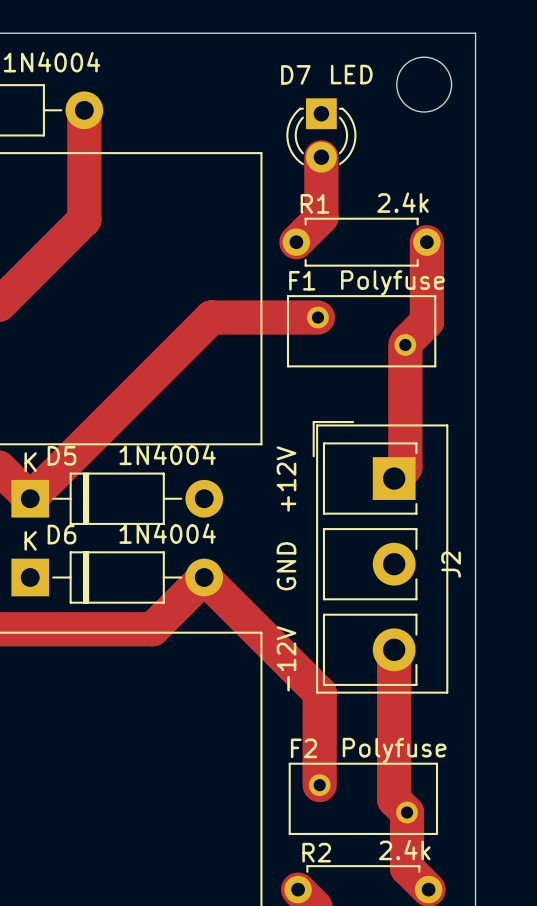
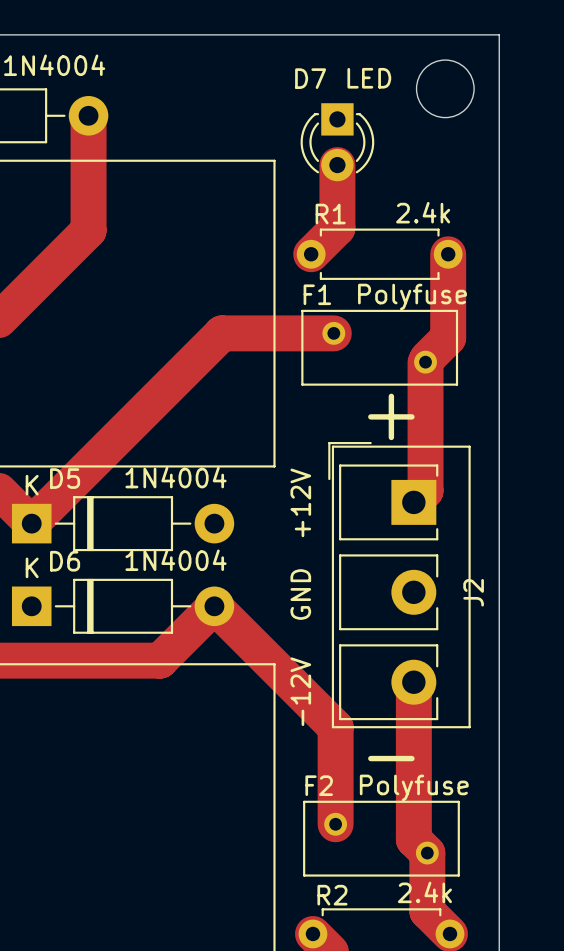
text: none -> + (391, 416)
text: none -> - (391, 758)

